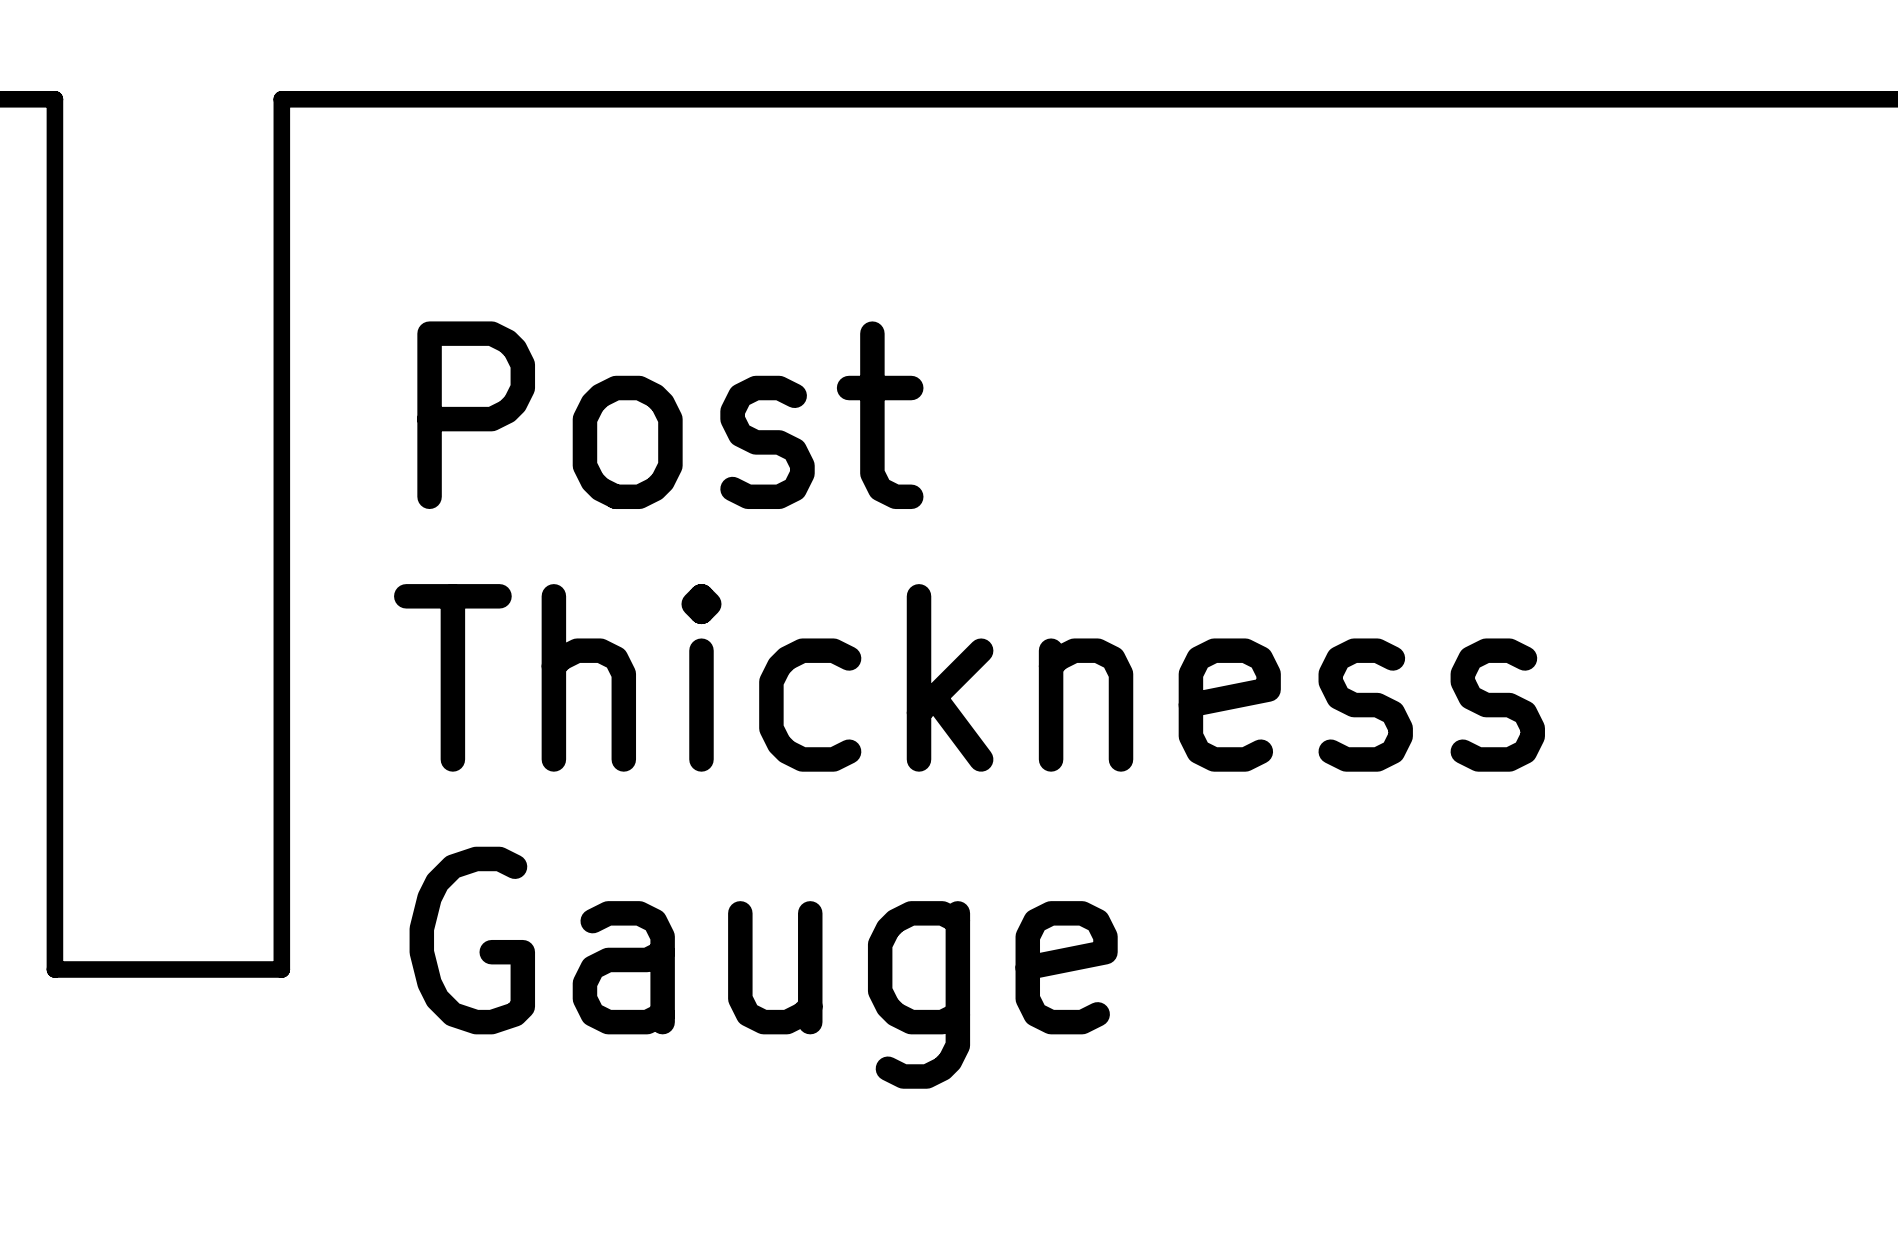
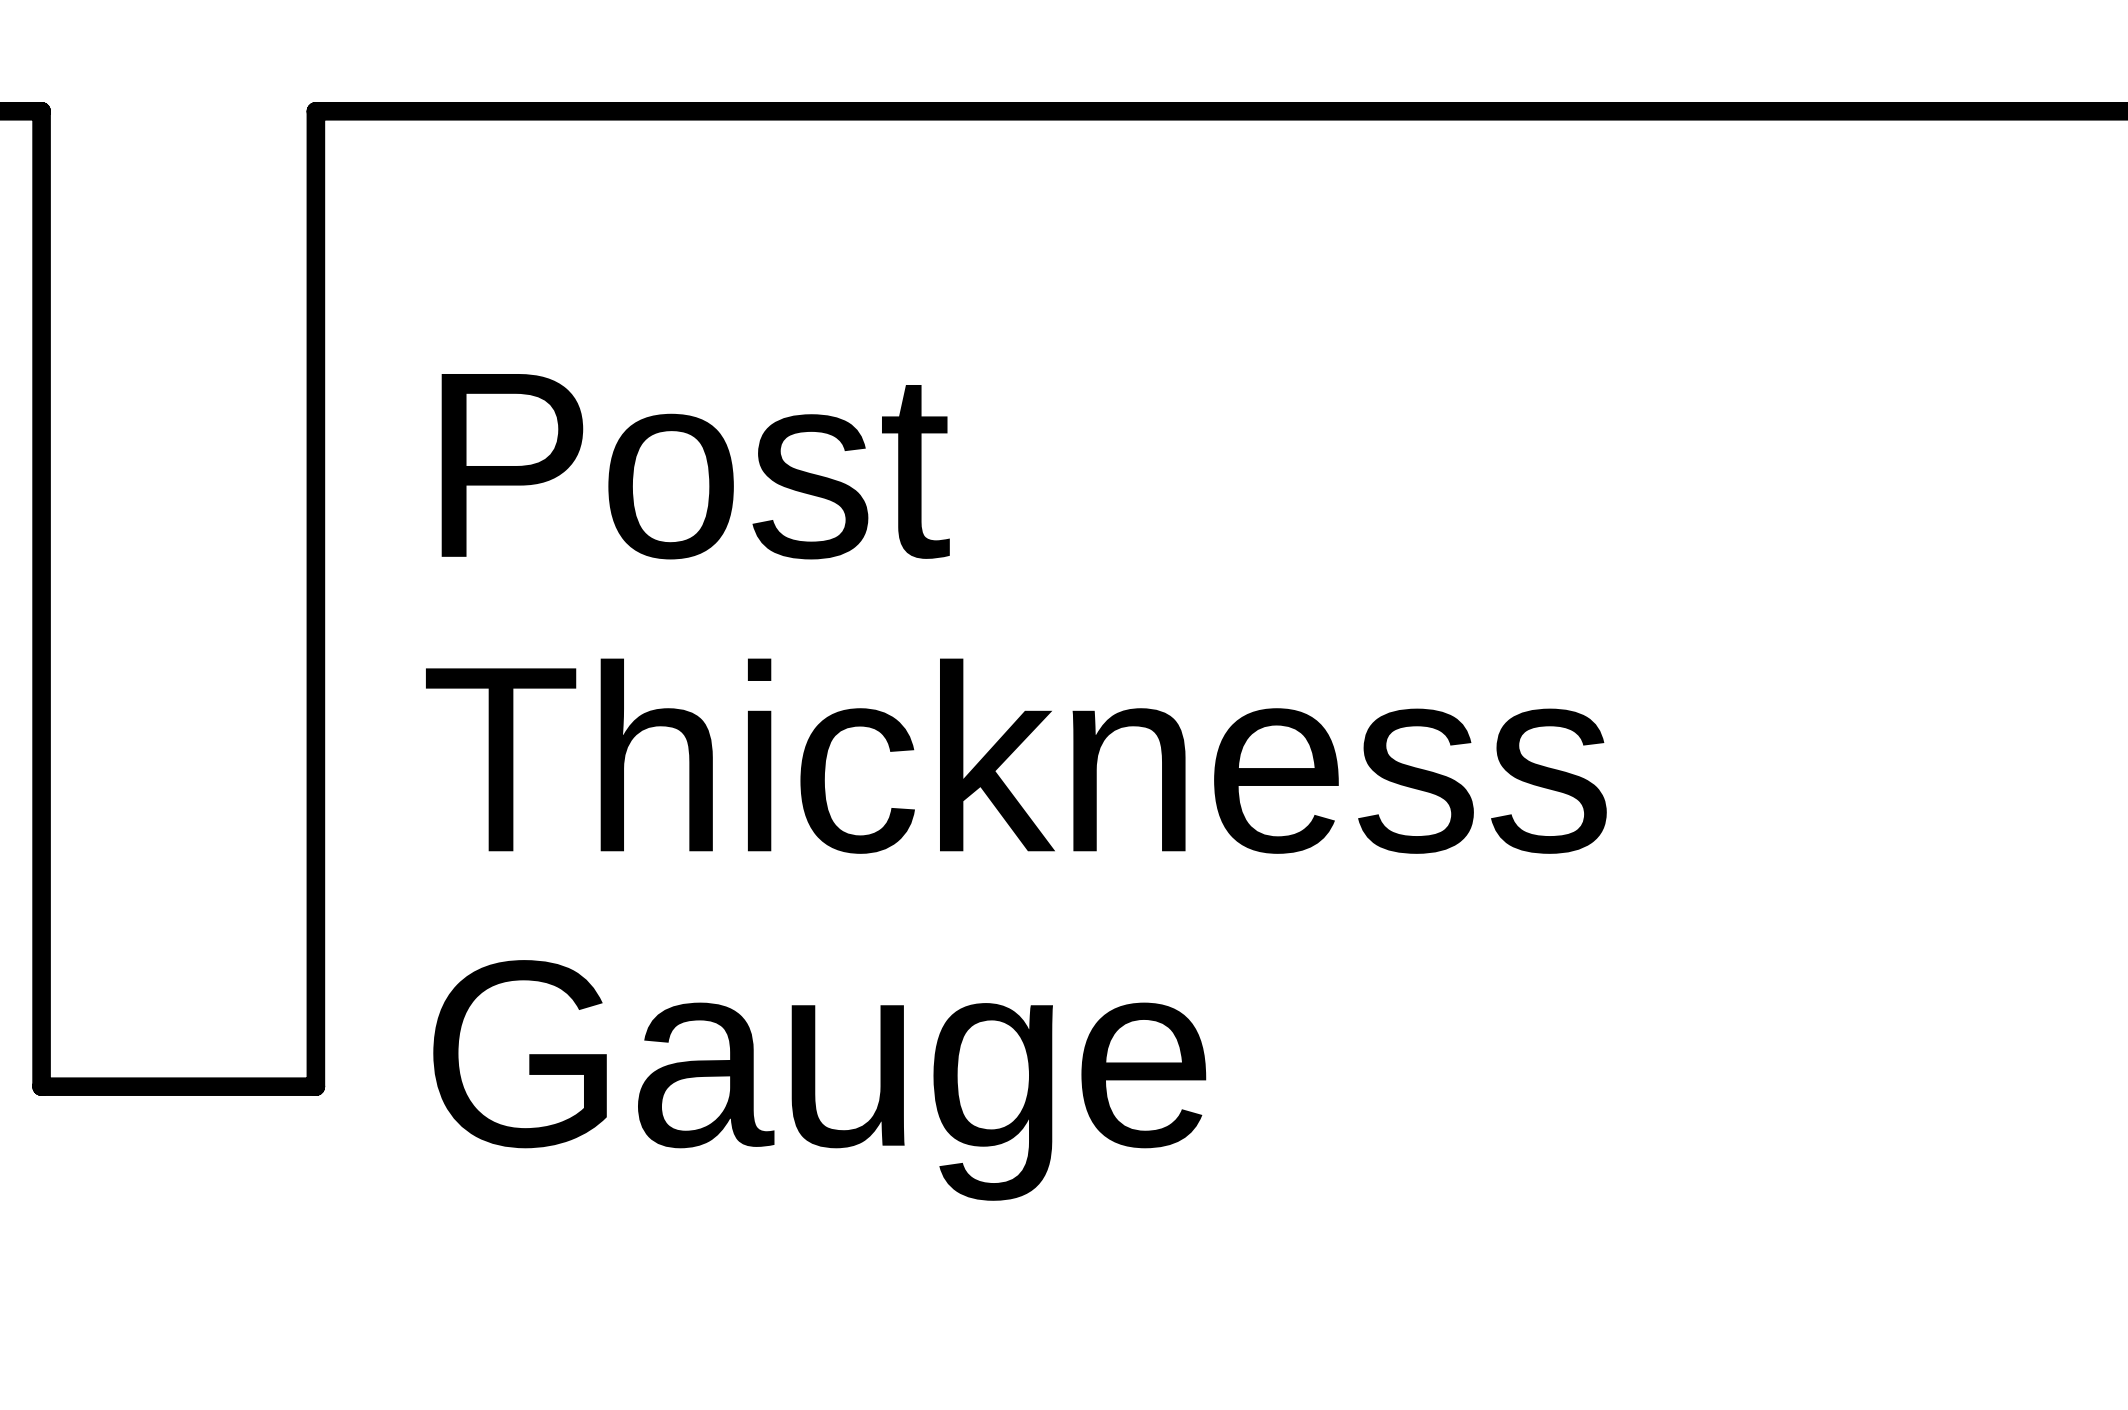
board edge: (37, 99) (54, 99) (54, 969) -> (41, 111) (41, 1086) (61, 1086)

